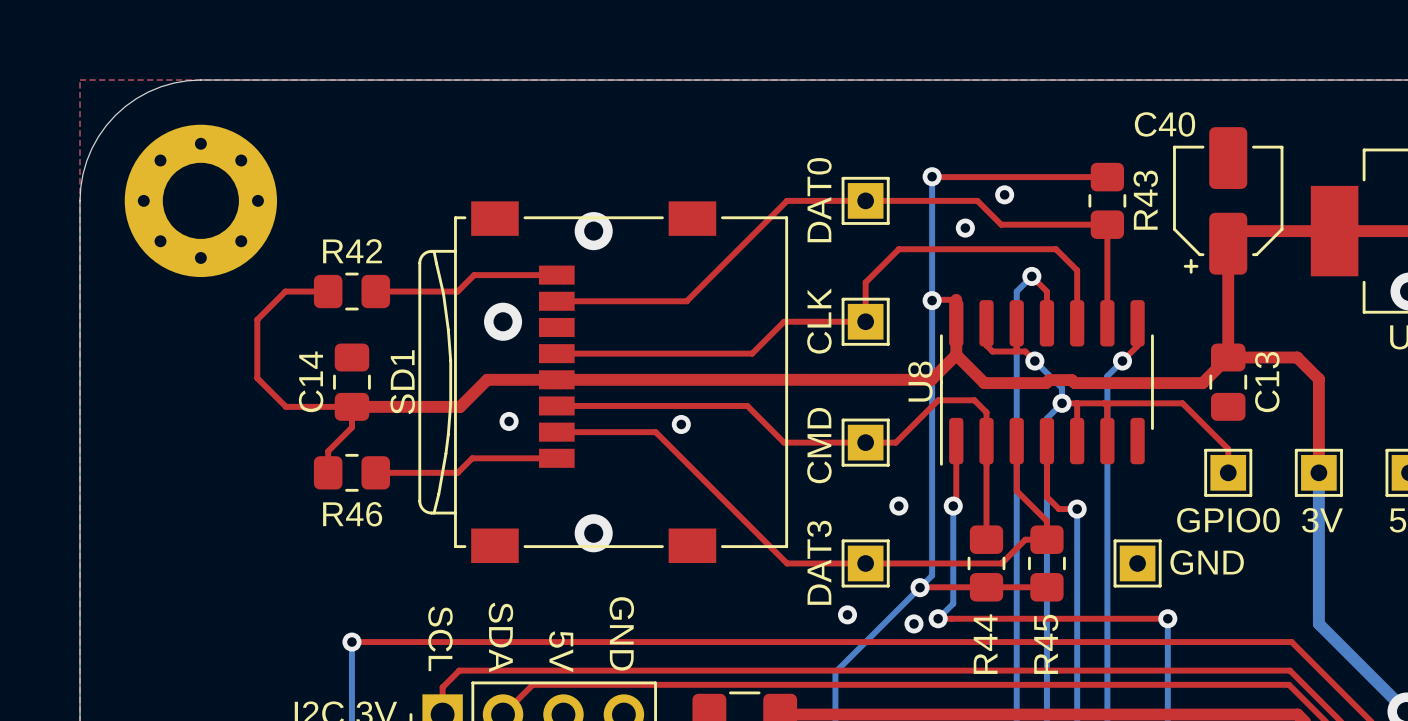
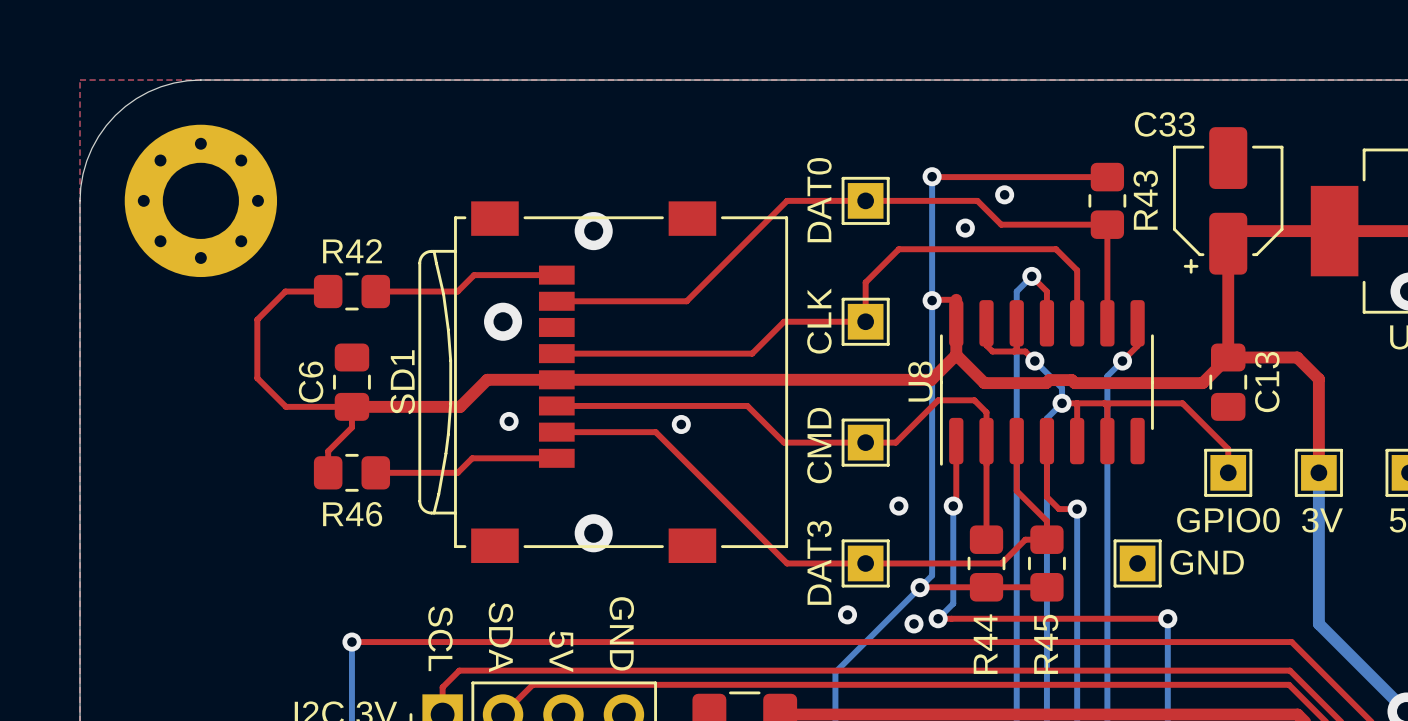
C40 name: C40 (1164, 124) -> C33 (1164, 124)
C14 name: C14 (311, 381) -> C6 (311, 382)

